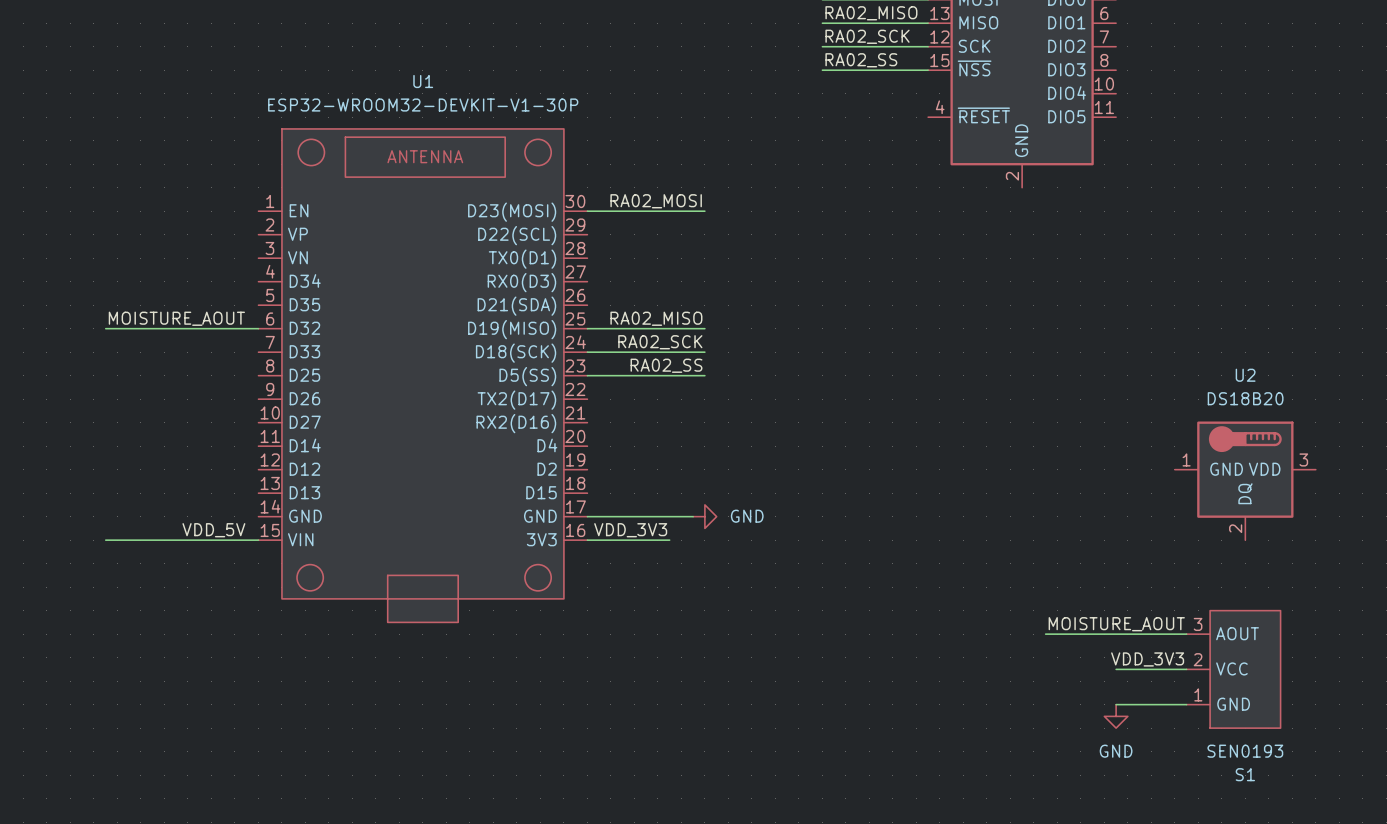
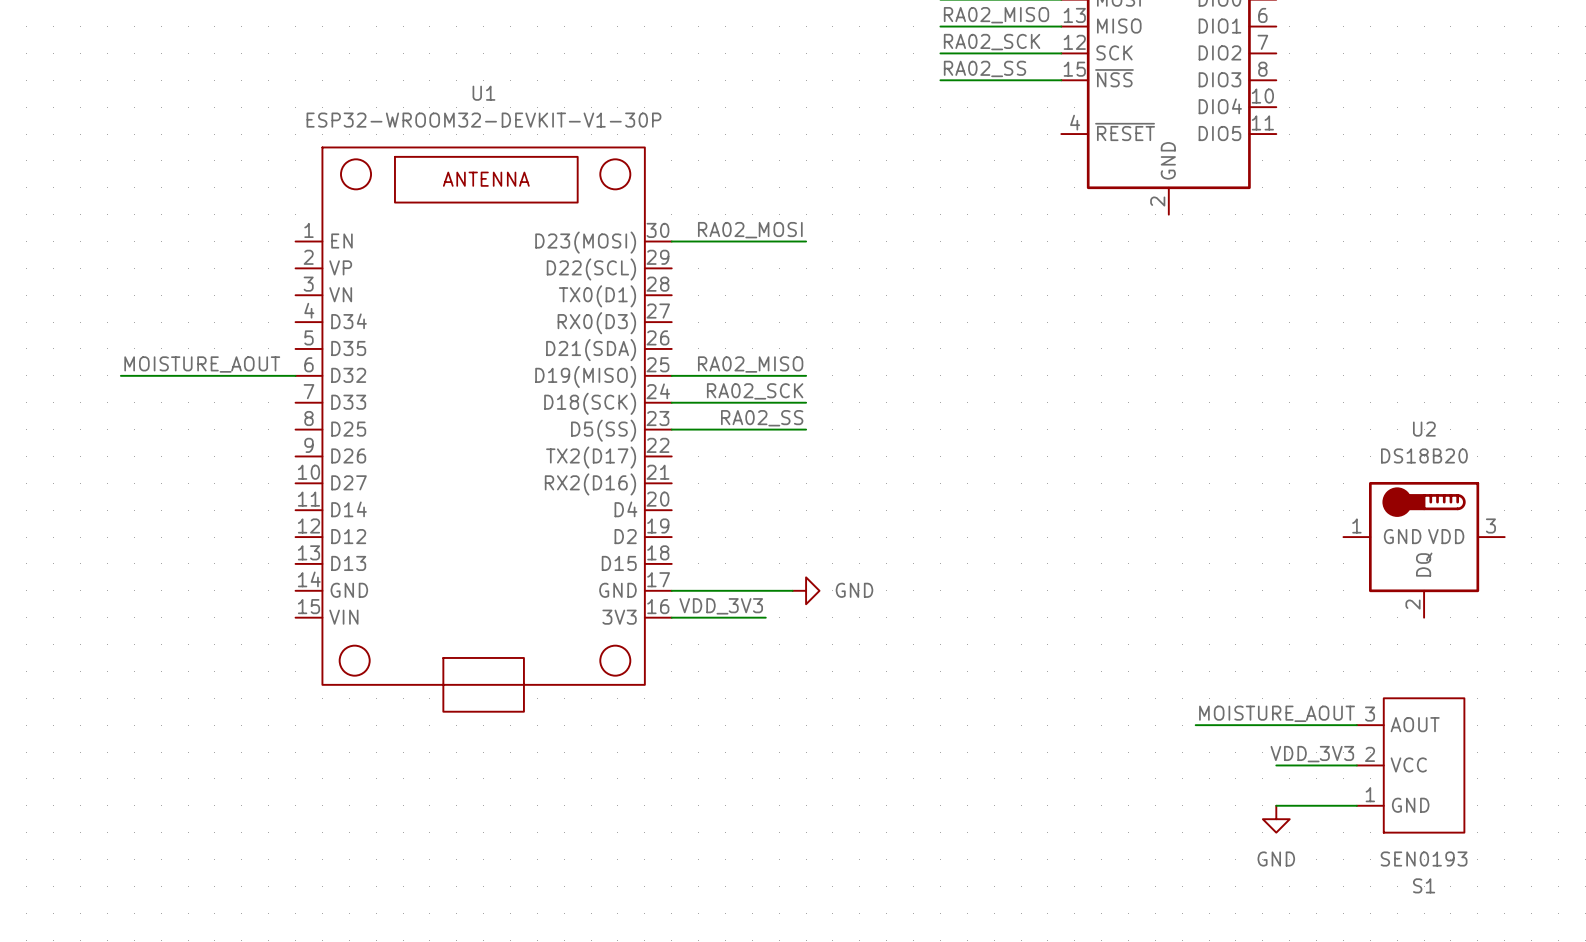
label: VDD_5V (213, 530) -> none
wire: (105, 540) (258, 540) -> none

